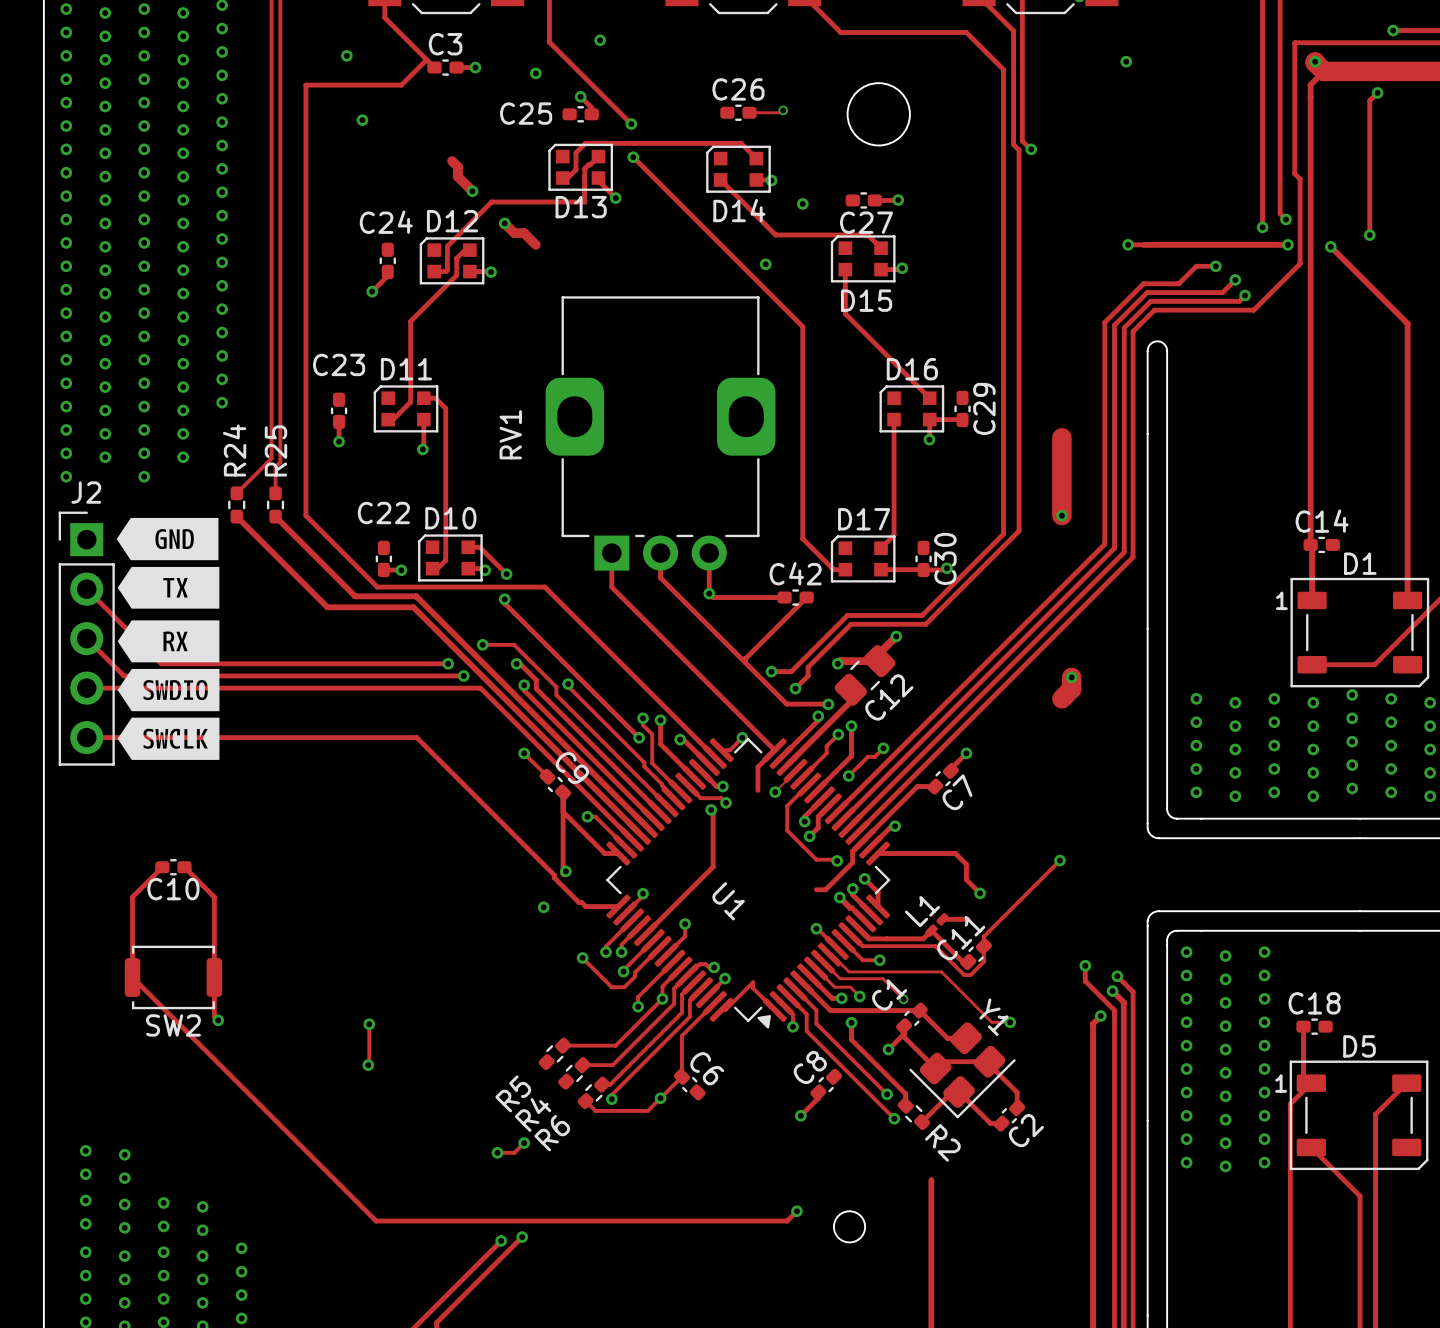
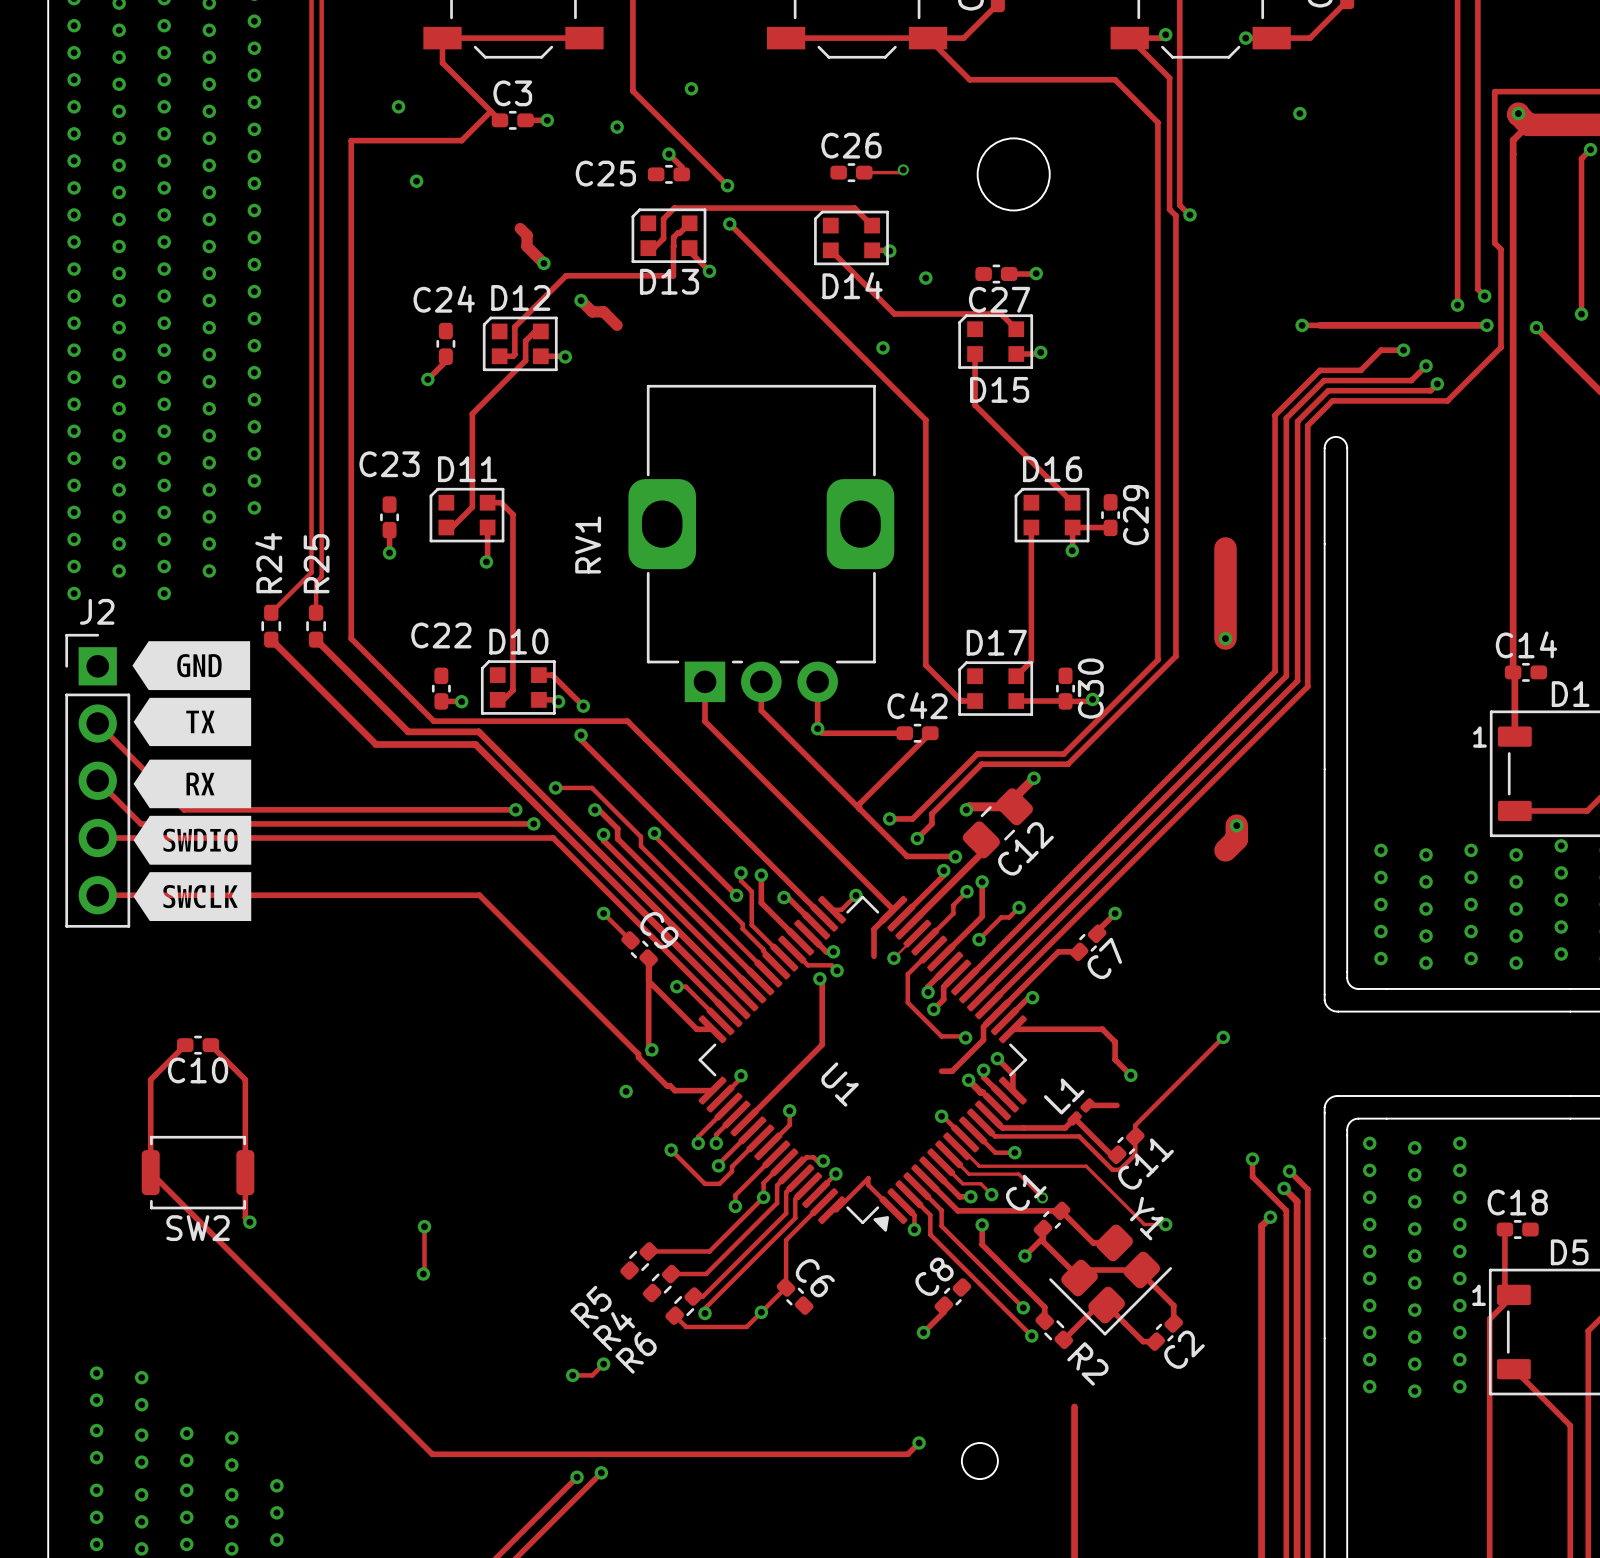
C11 name position: C11 (961, 938) -> C11 (1146, 1163)

